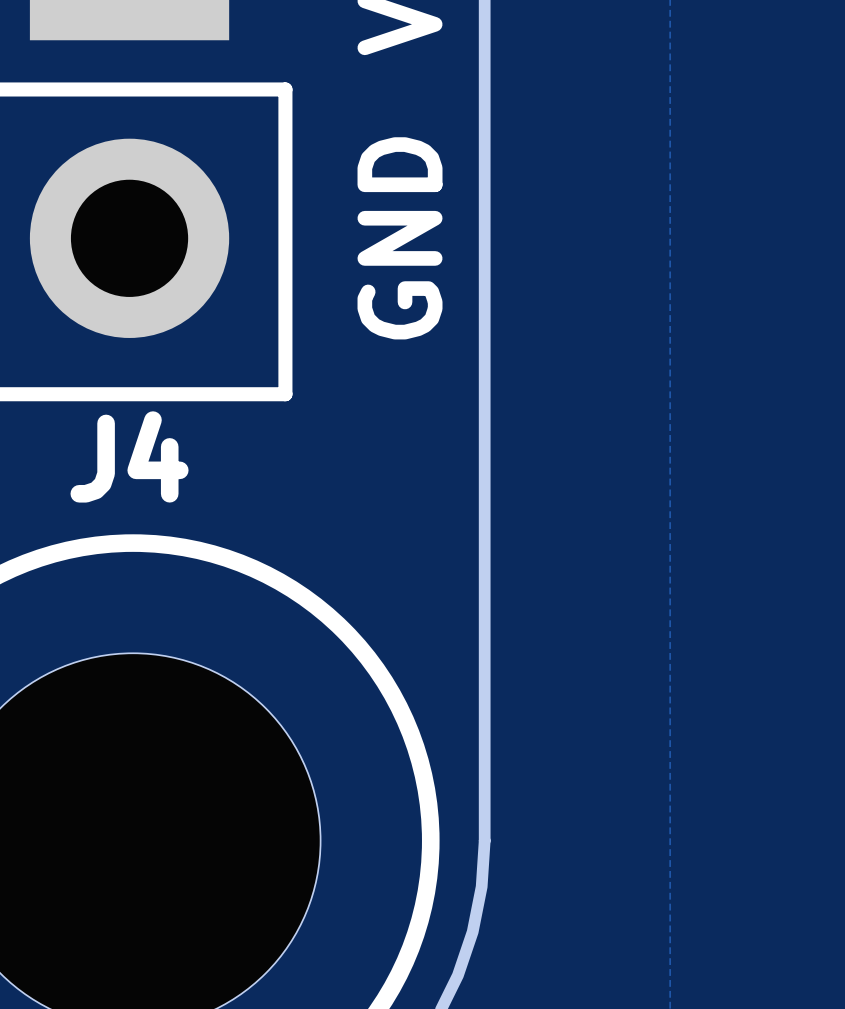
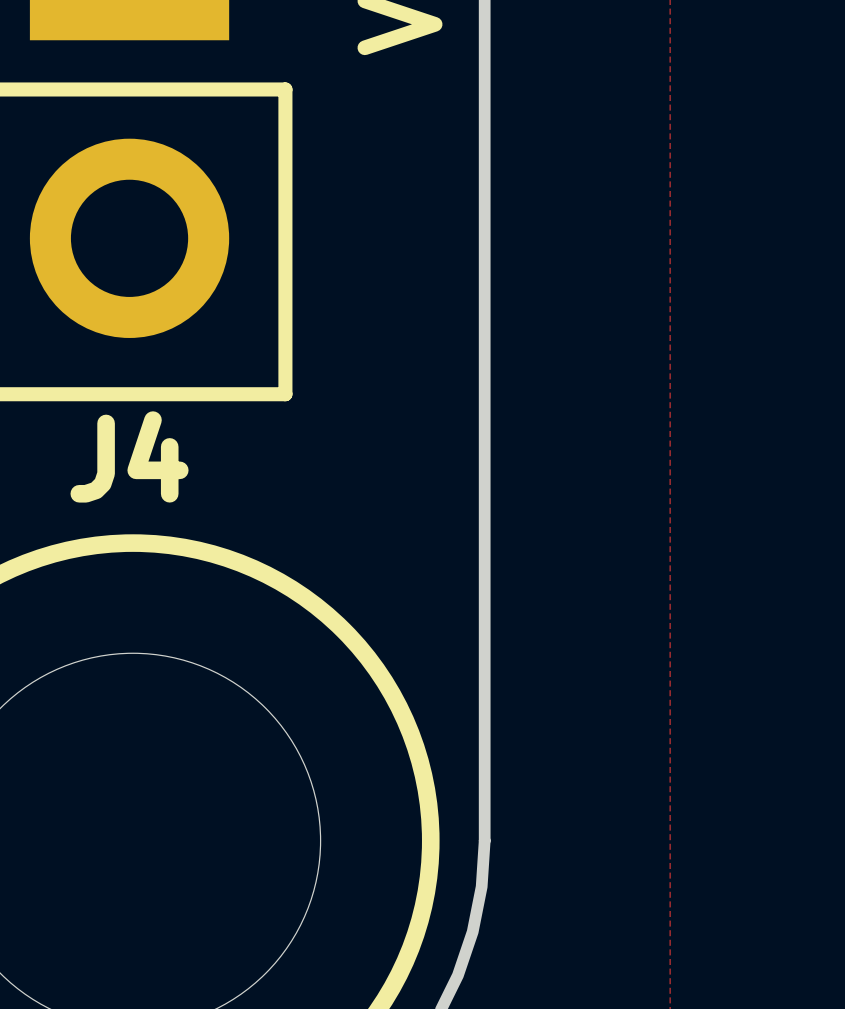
text: GND (400, 238) -> none

